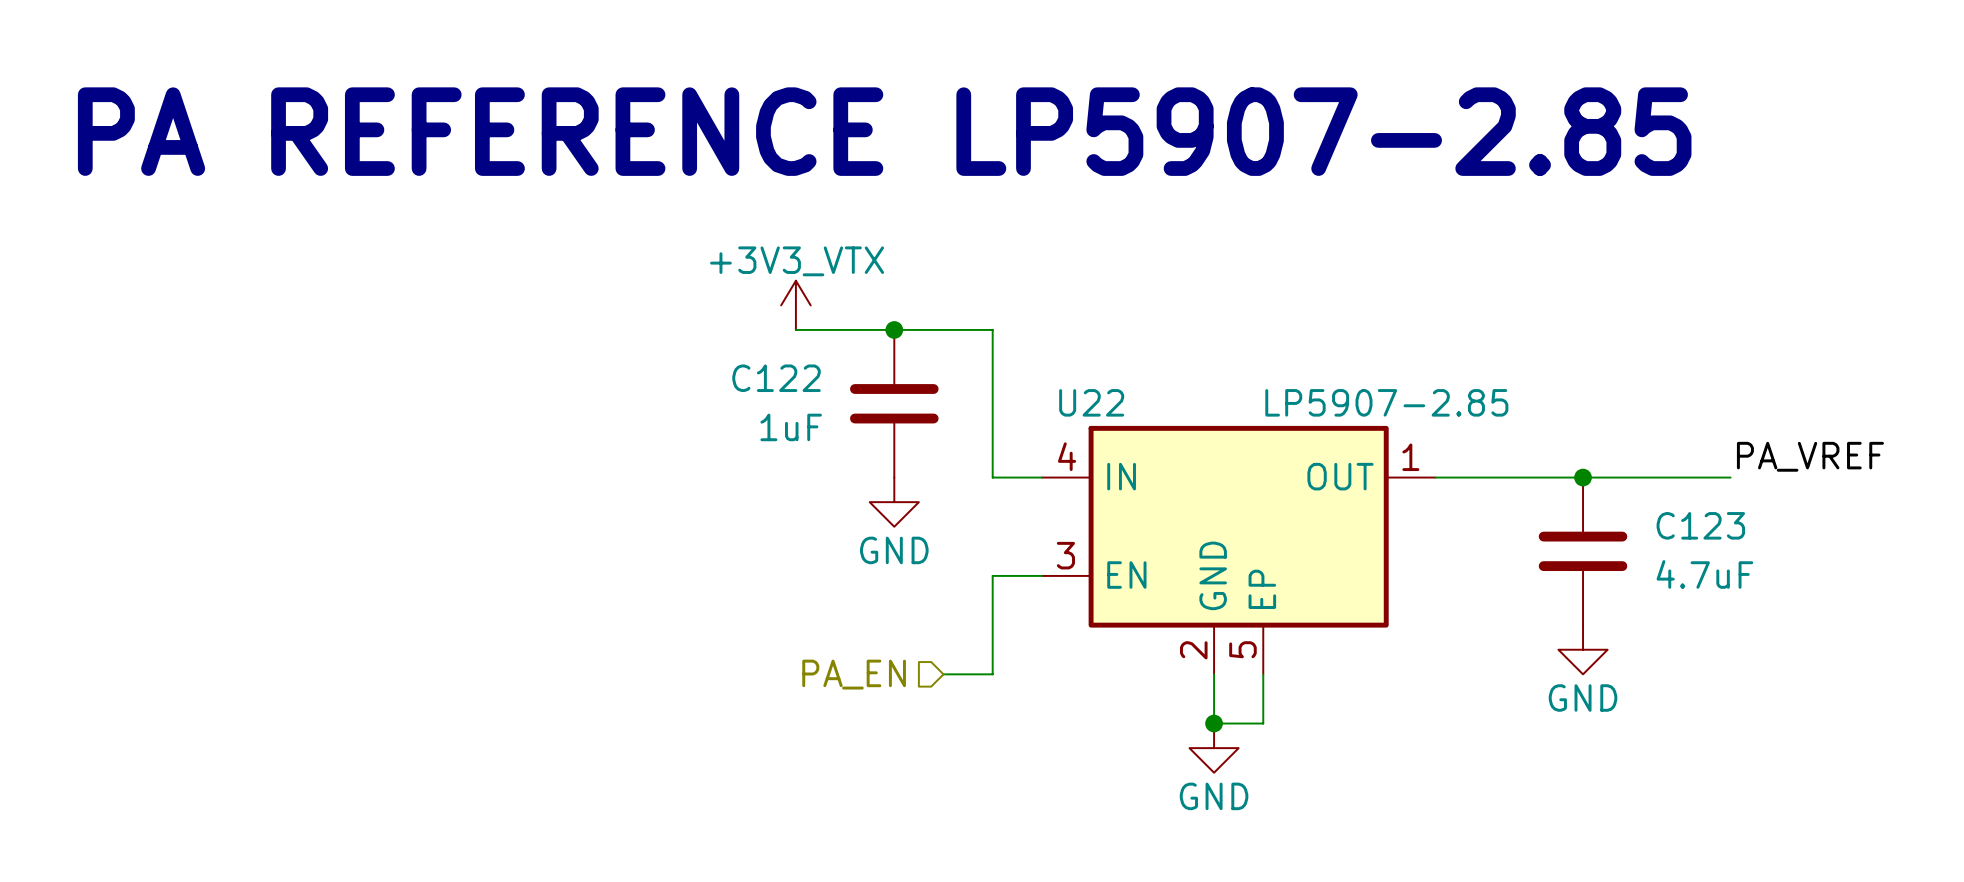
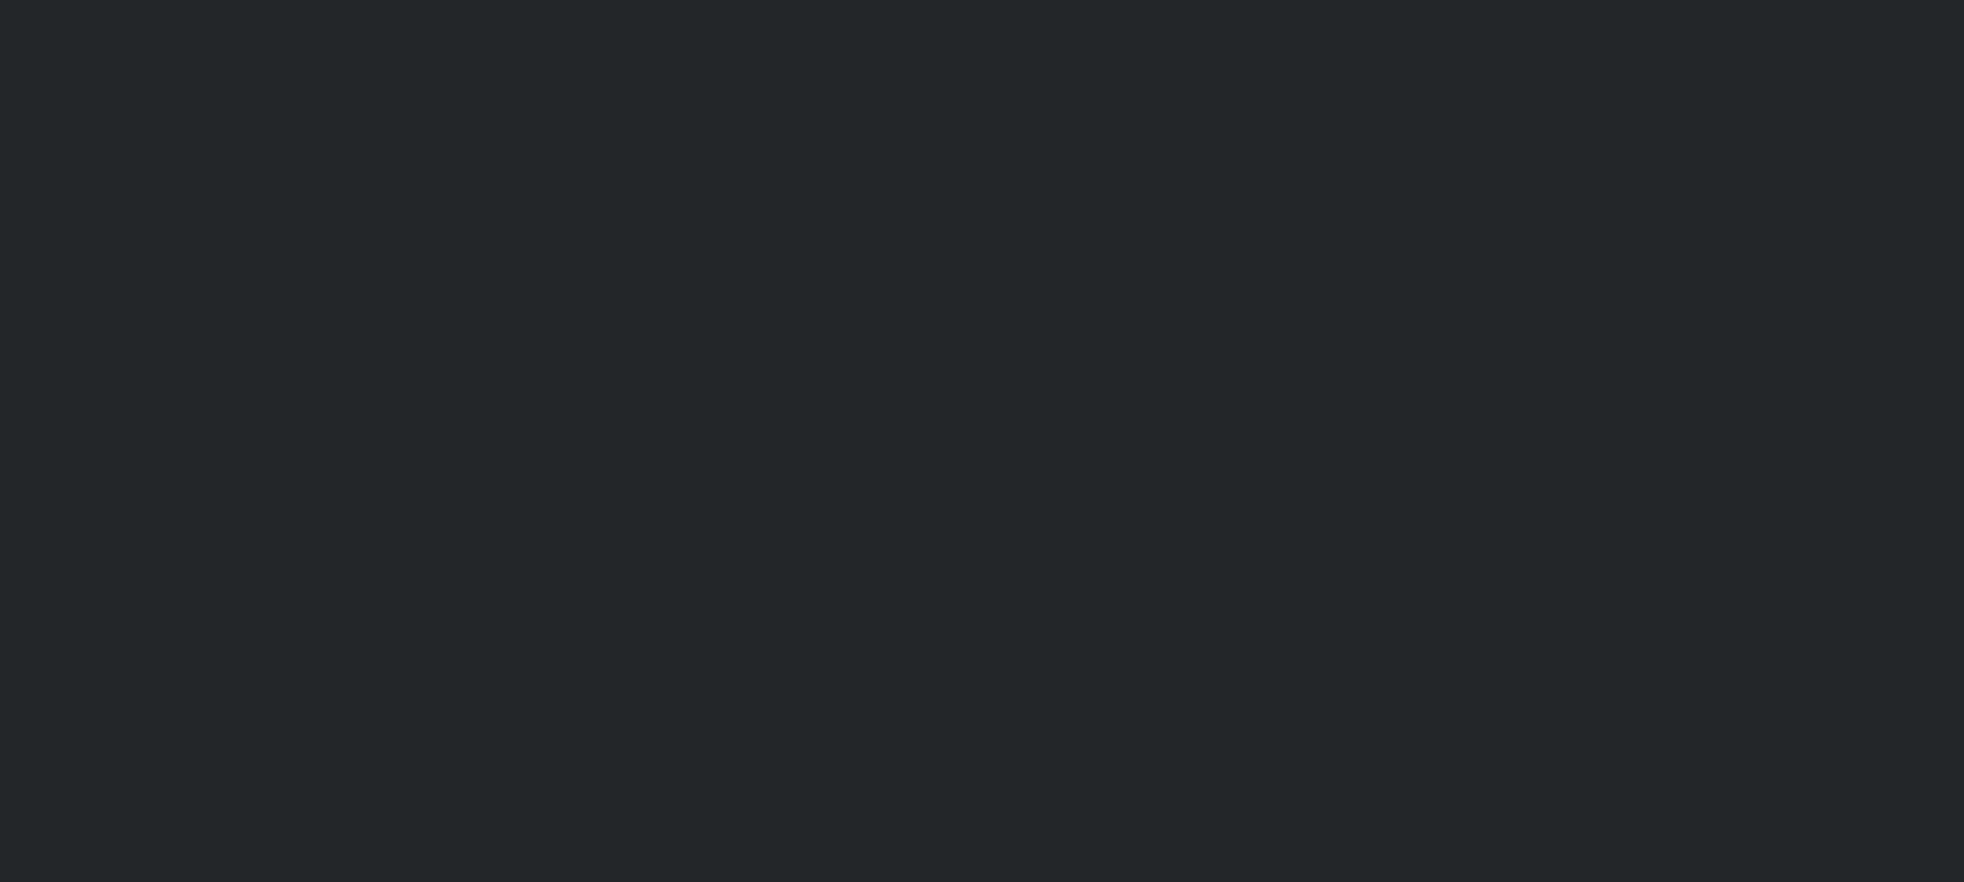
text: PA REFERENCE LP5907-2.85 (884, 131) -> none
power symbol: +3V3_VTX (795, 305) -> none
wire: (795, 329) (992, 329) (992, 477) (1041, 477) -> none
junction: (894, 329) -> none
C122: 1uF (894, 403) -> none
label: PA_VREF (1810, 456) -> none
wire: (1435, 477) (1730, 477) -> none
junction: (1583, 477) -> none
power symbol: GND (894, 502) -> none
U22: LP5907-2.85 (1238, 550) -> none
C123: 4.7uF (1583, 551) -> none
wire: (1041, 575) (992, 575) (992, 674) (943, 674) -> none
power symbol: GND (1583, 649) -> none
hierarchical label: PA_EN (854, 674) -> none
wire: (1214, 674) (1214, 723) (1263, 723) (1263, 674) -> none
junction: (1214, 723) -> none
power symbol: GND (1214, 748) -> none

